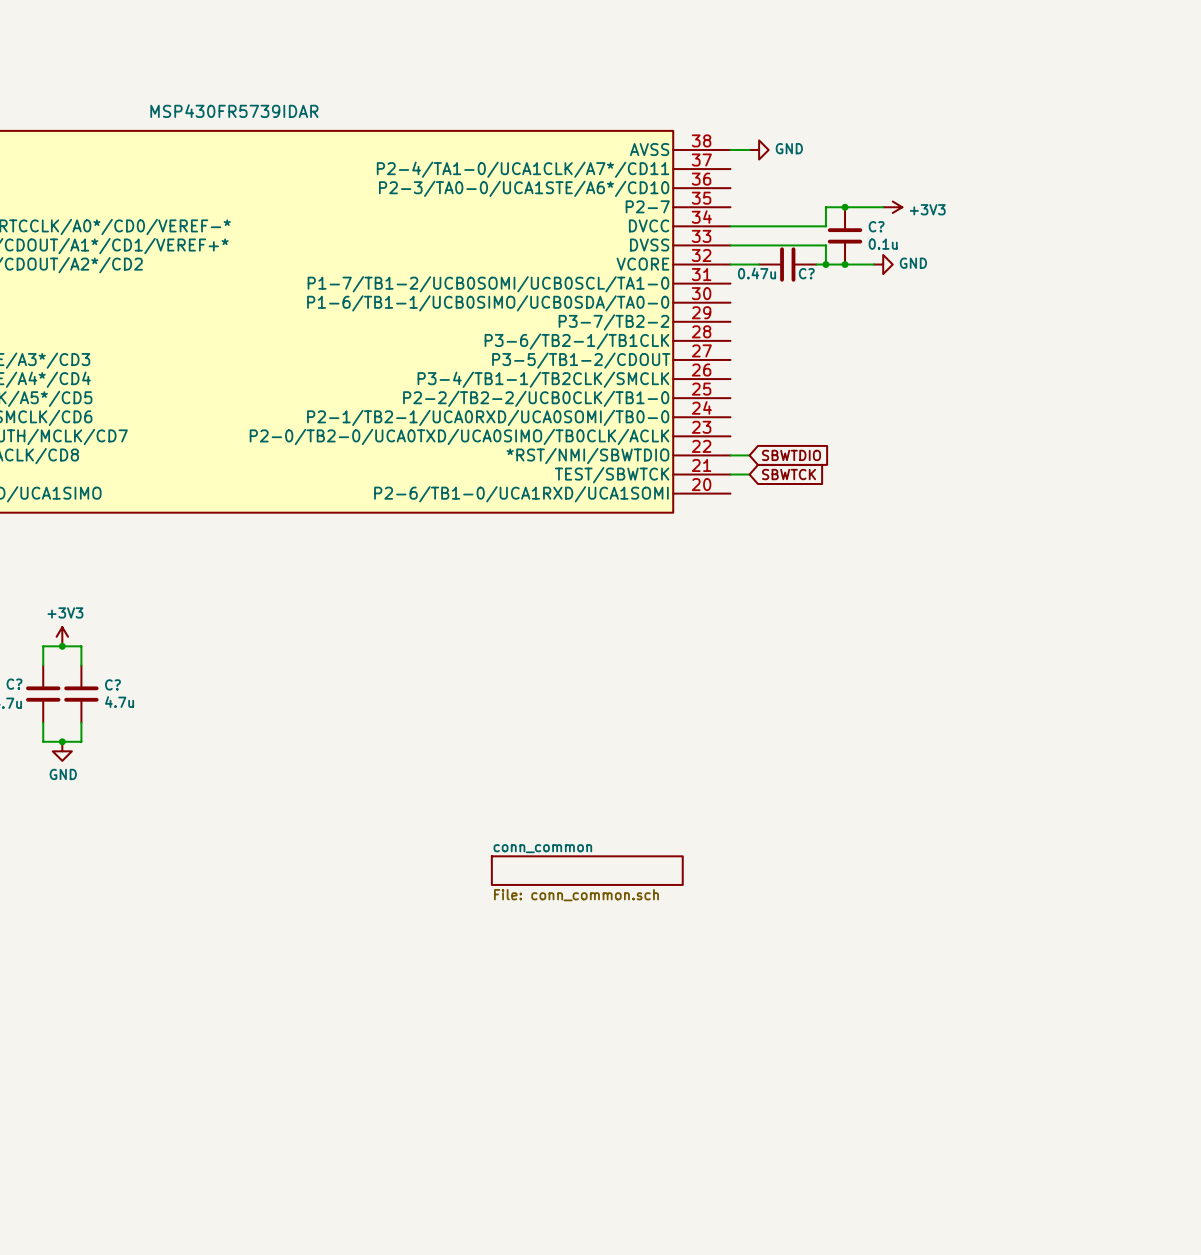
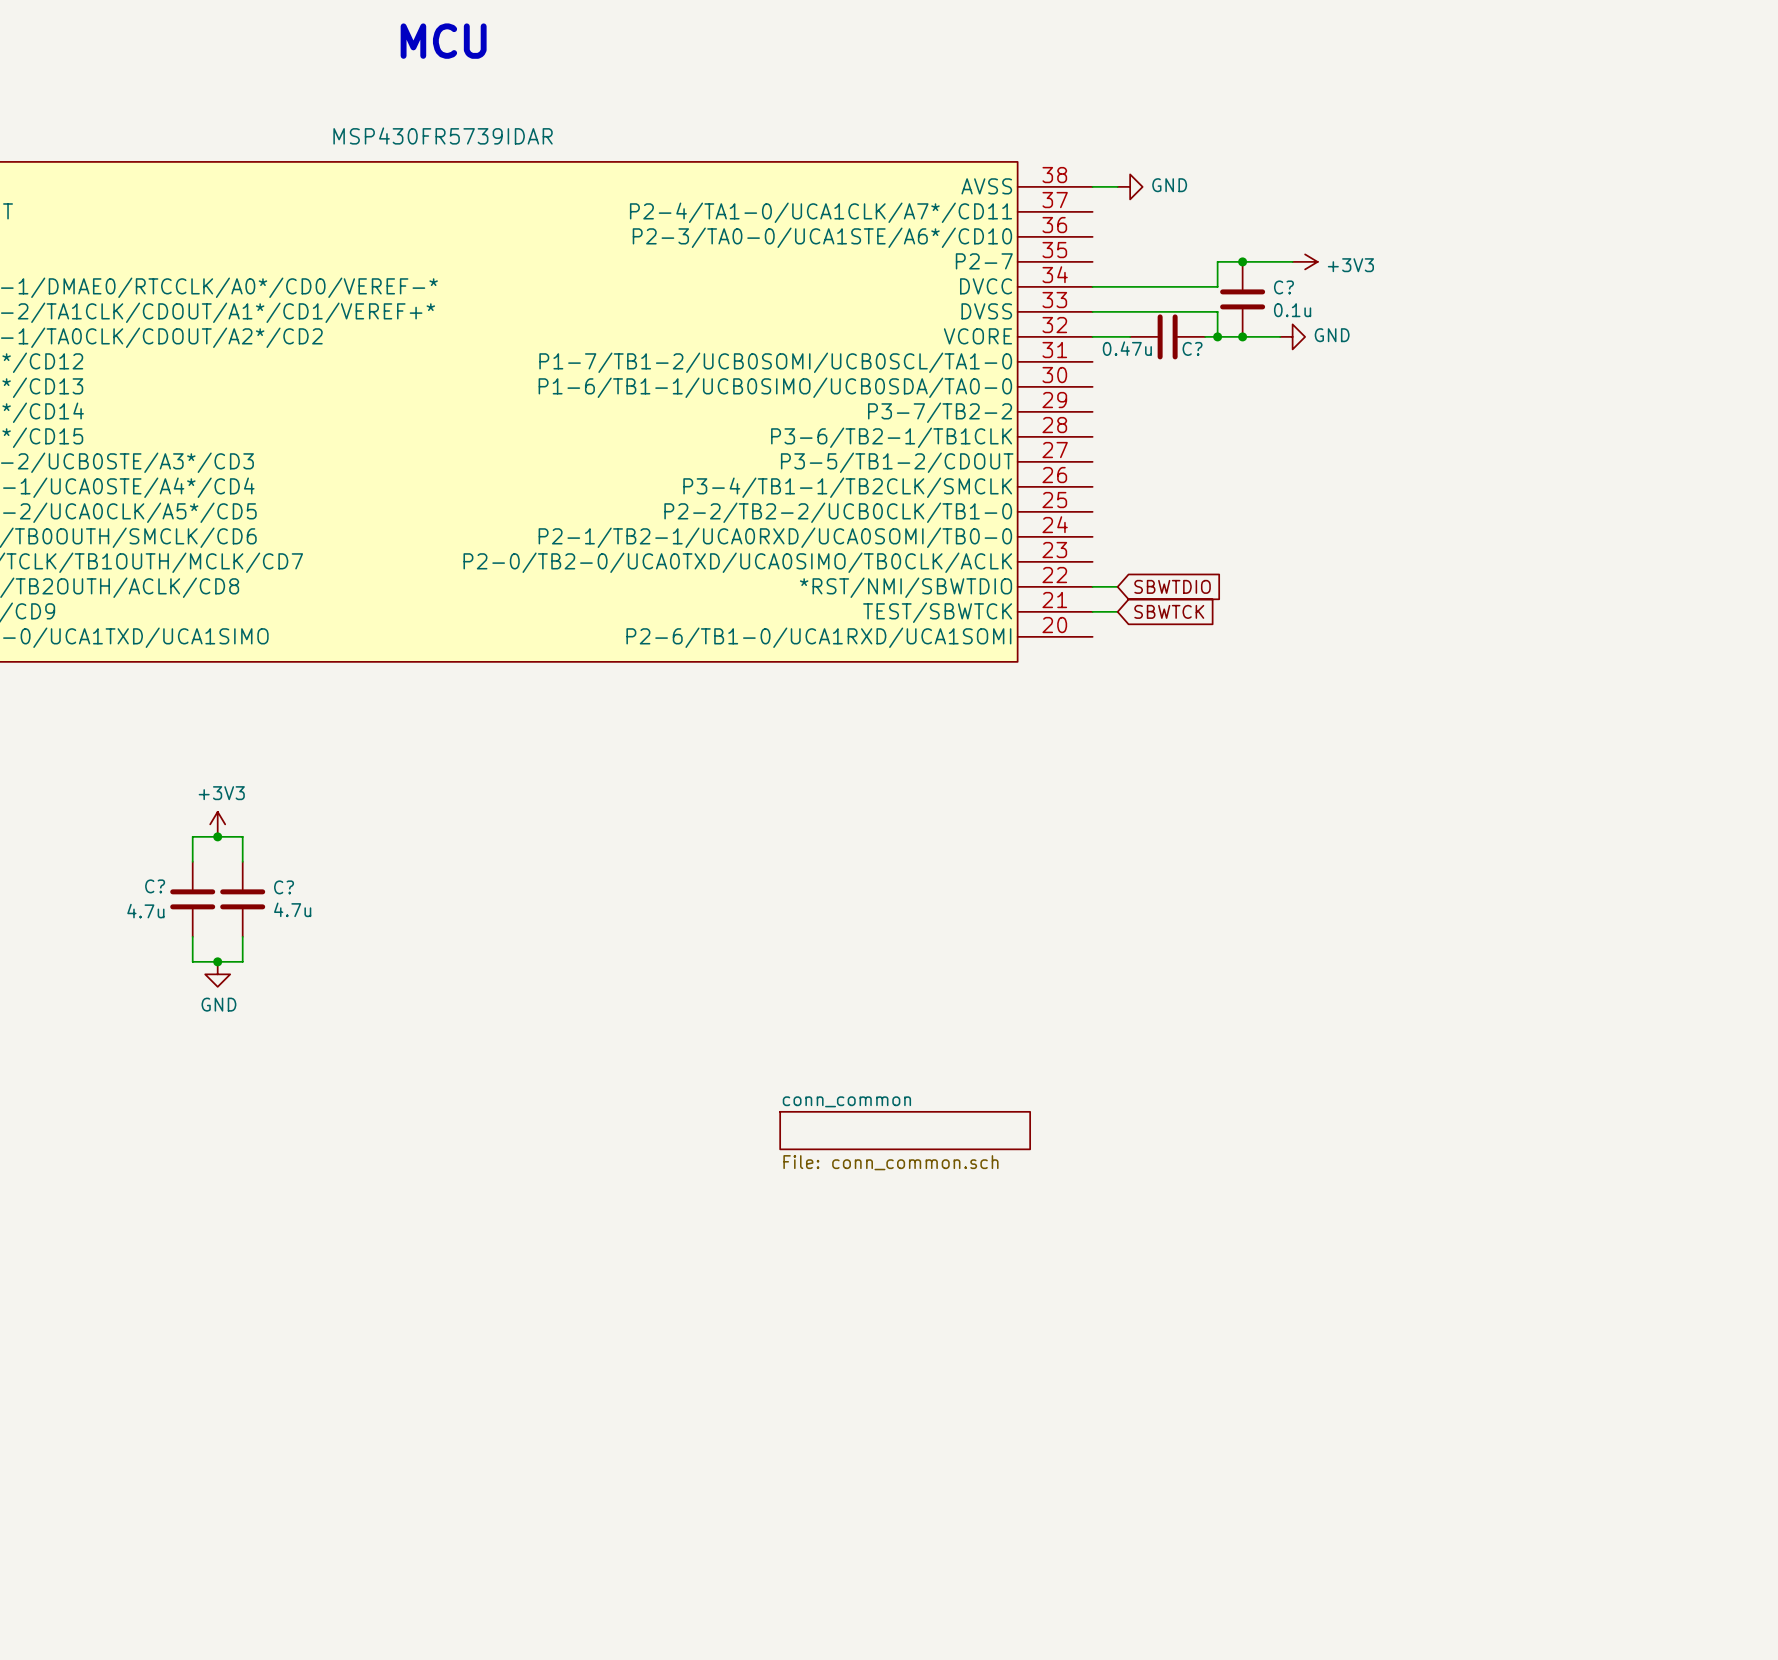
text: none -> MCU (443, 41)

